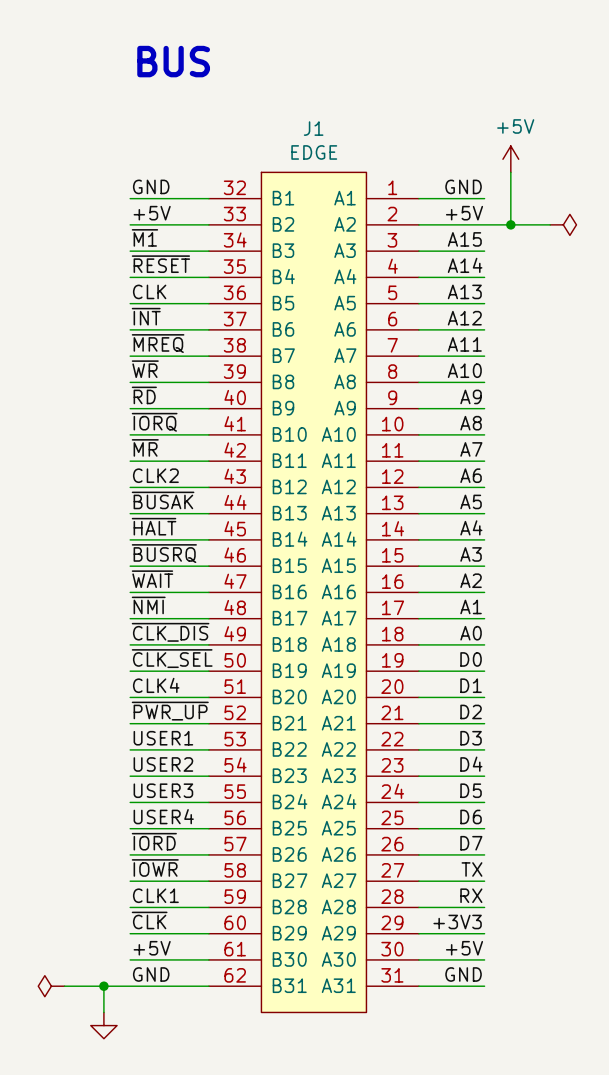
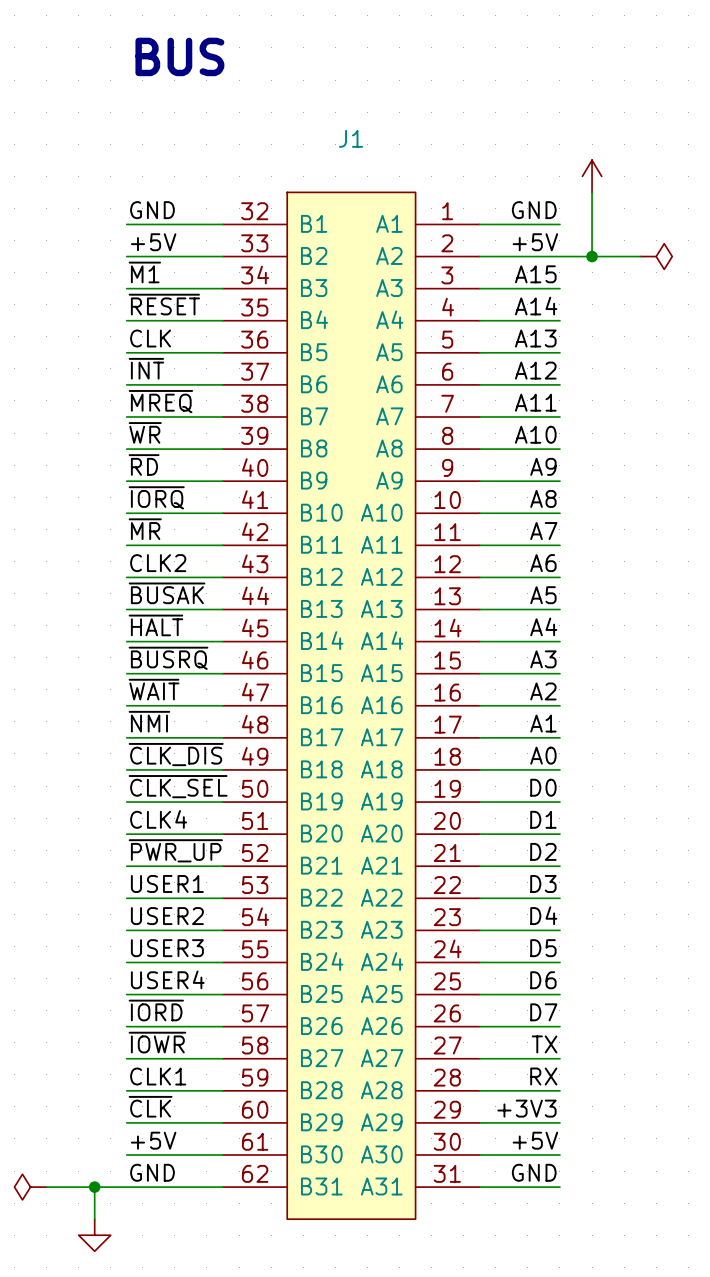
power symbol text: +5V (515, 126) -> none
J1 value: EDGE (314, 152) -> none

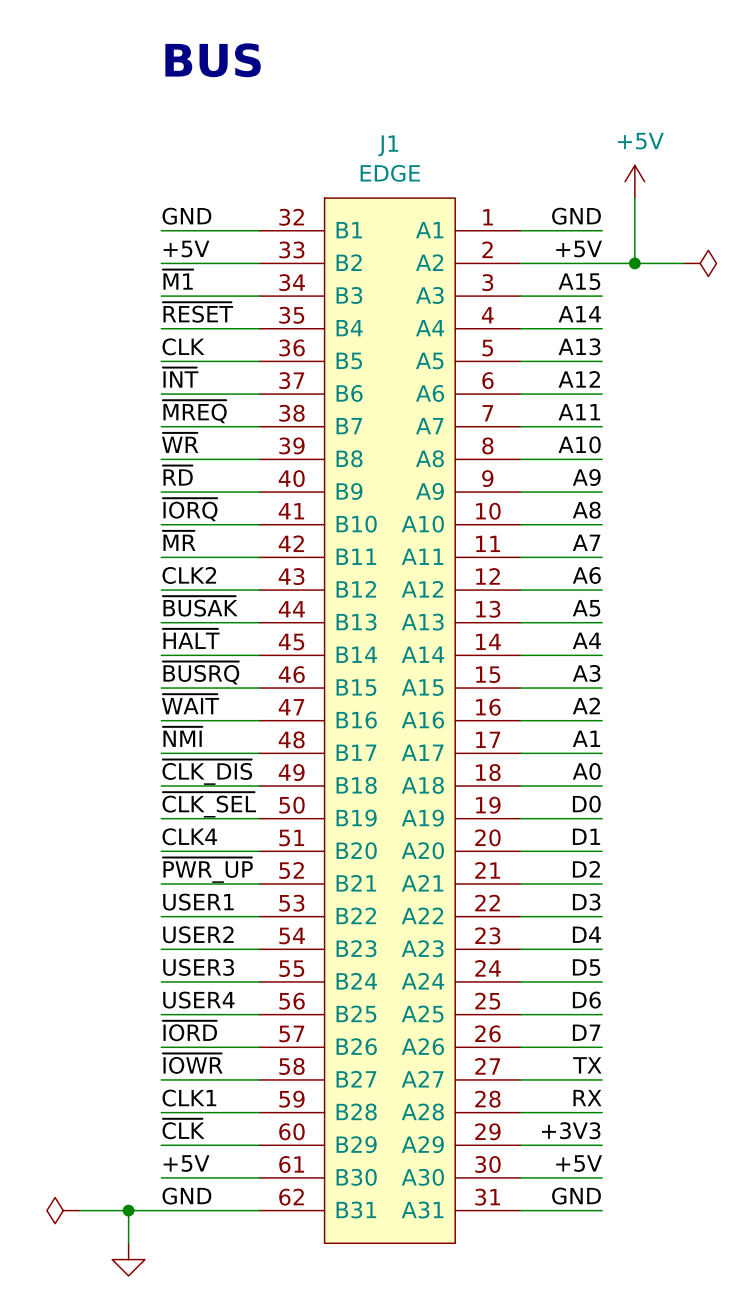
power symbol text: none -> +5V (640, 141)
J1 value: none -> EDGE (390, 173)

